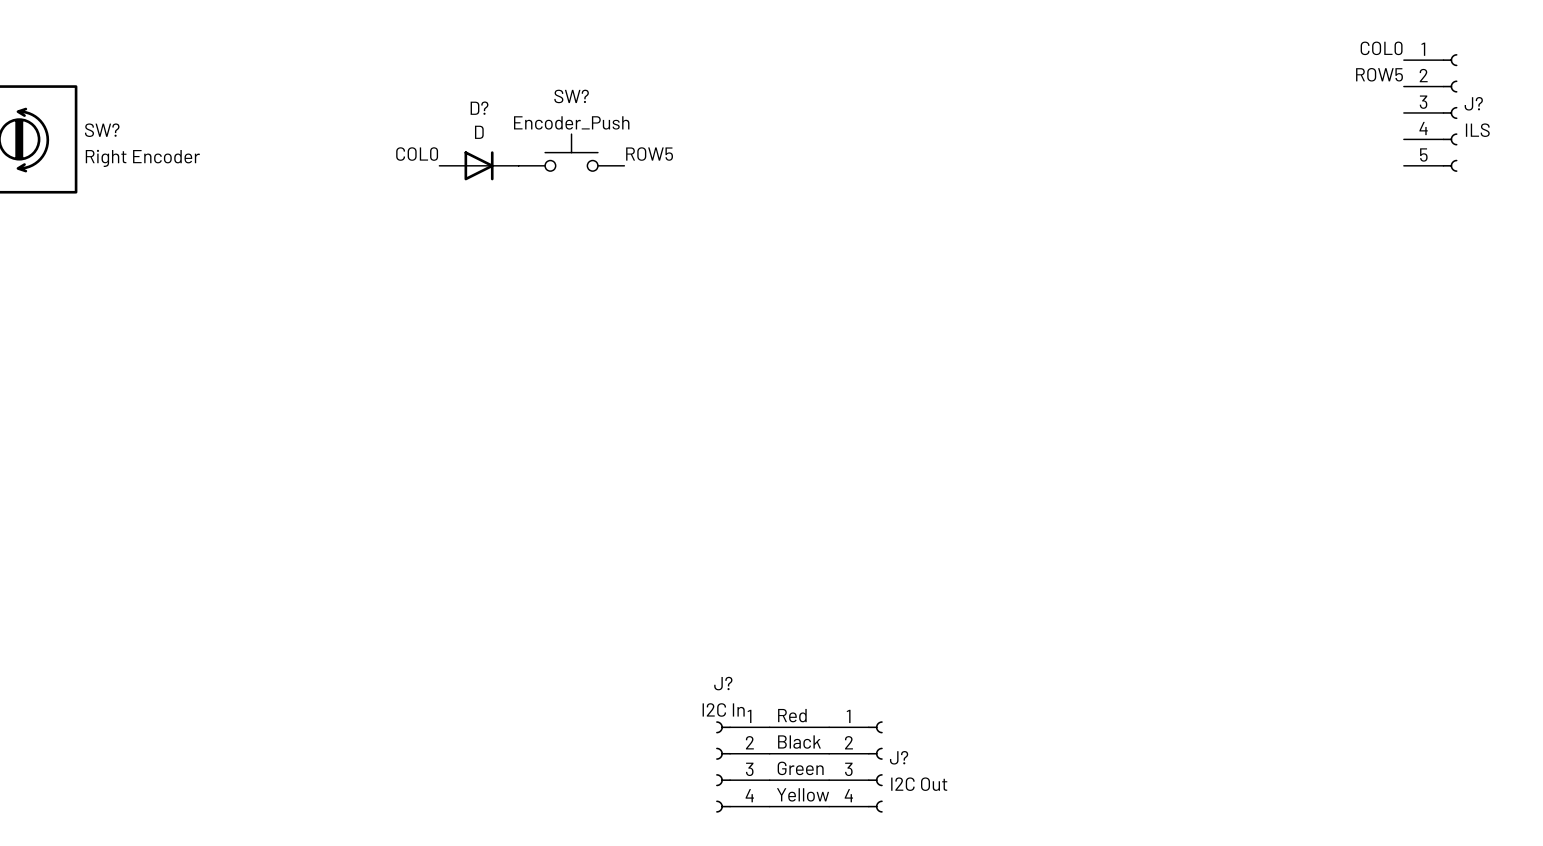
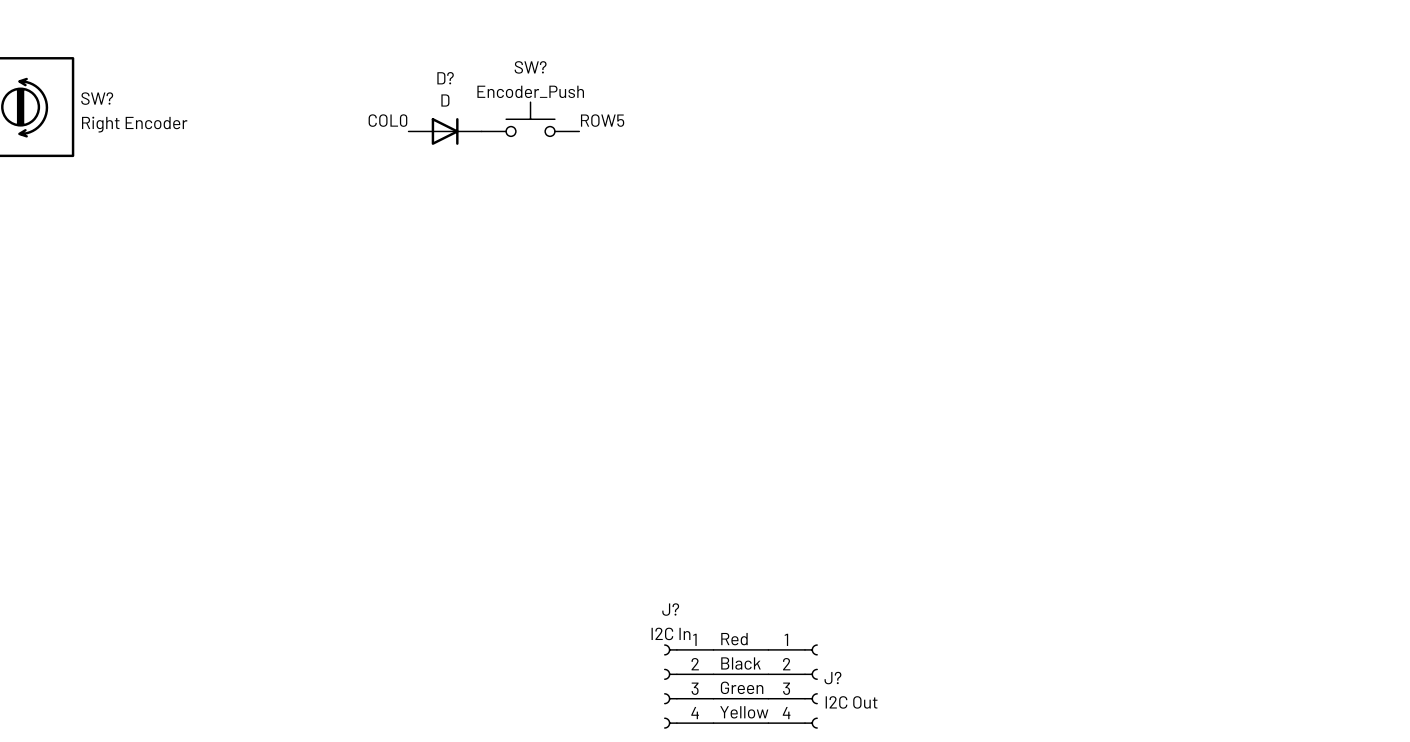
label: COL0 (1381, 48) -> none
label: ROW5 (1379, 74) -> none
J?: ILS (1430, 112) -> none

